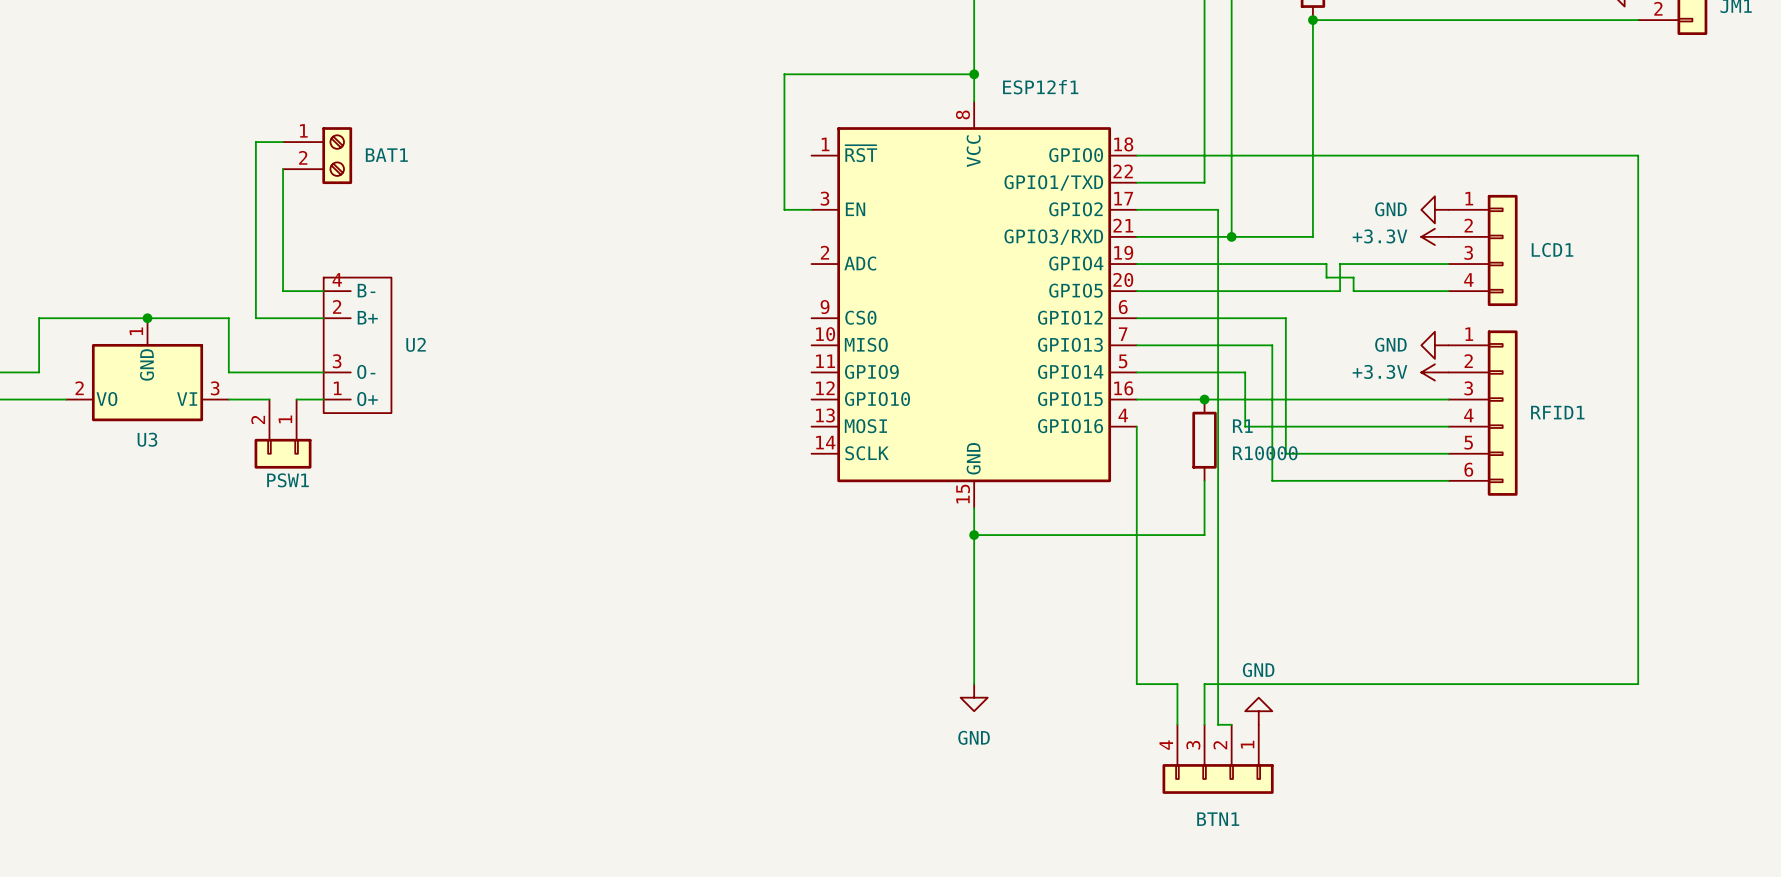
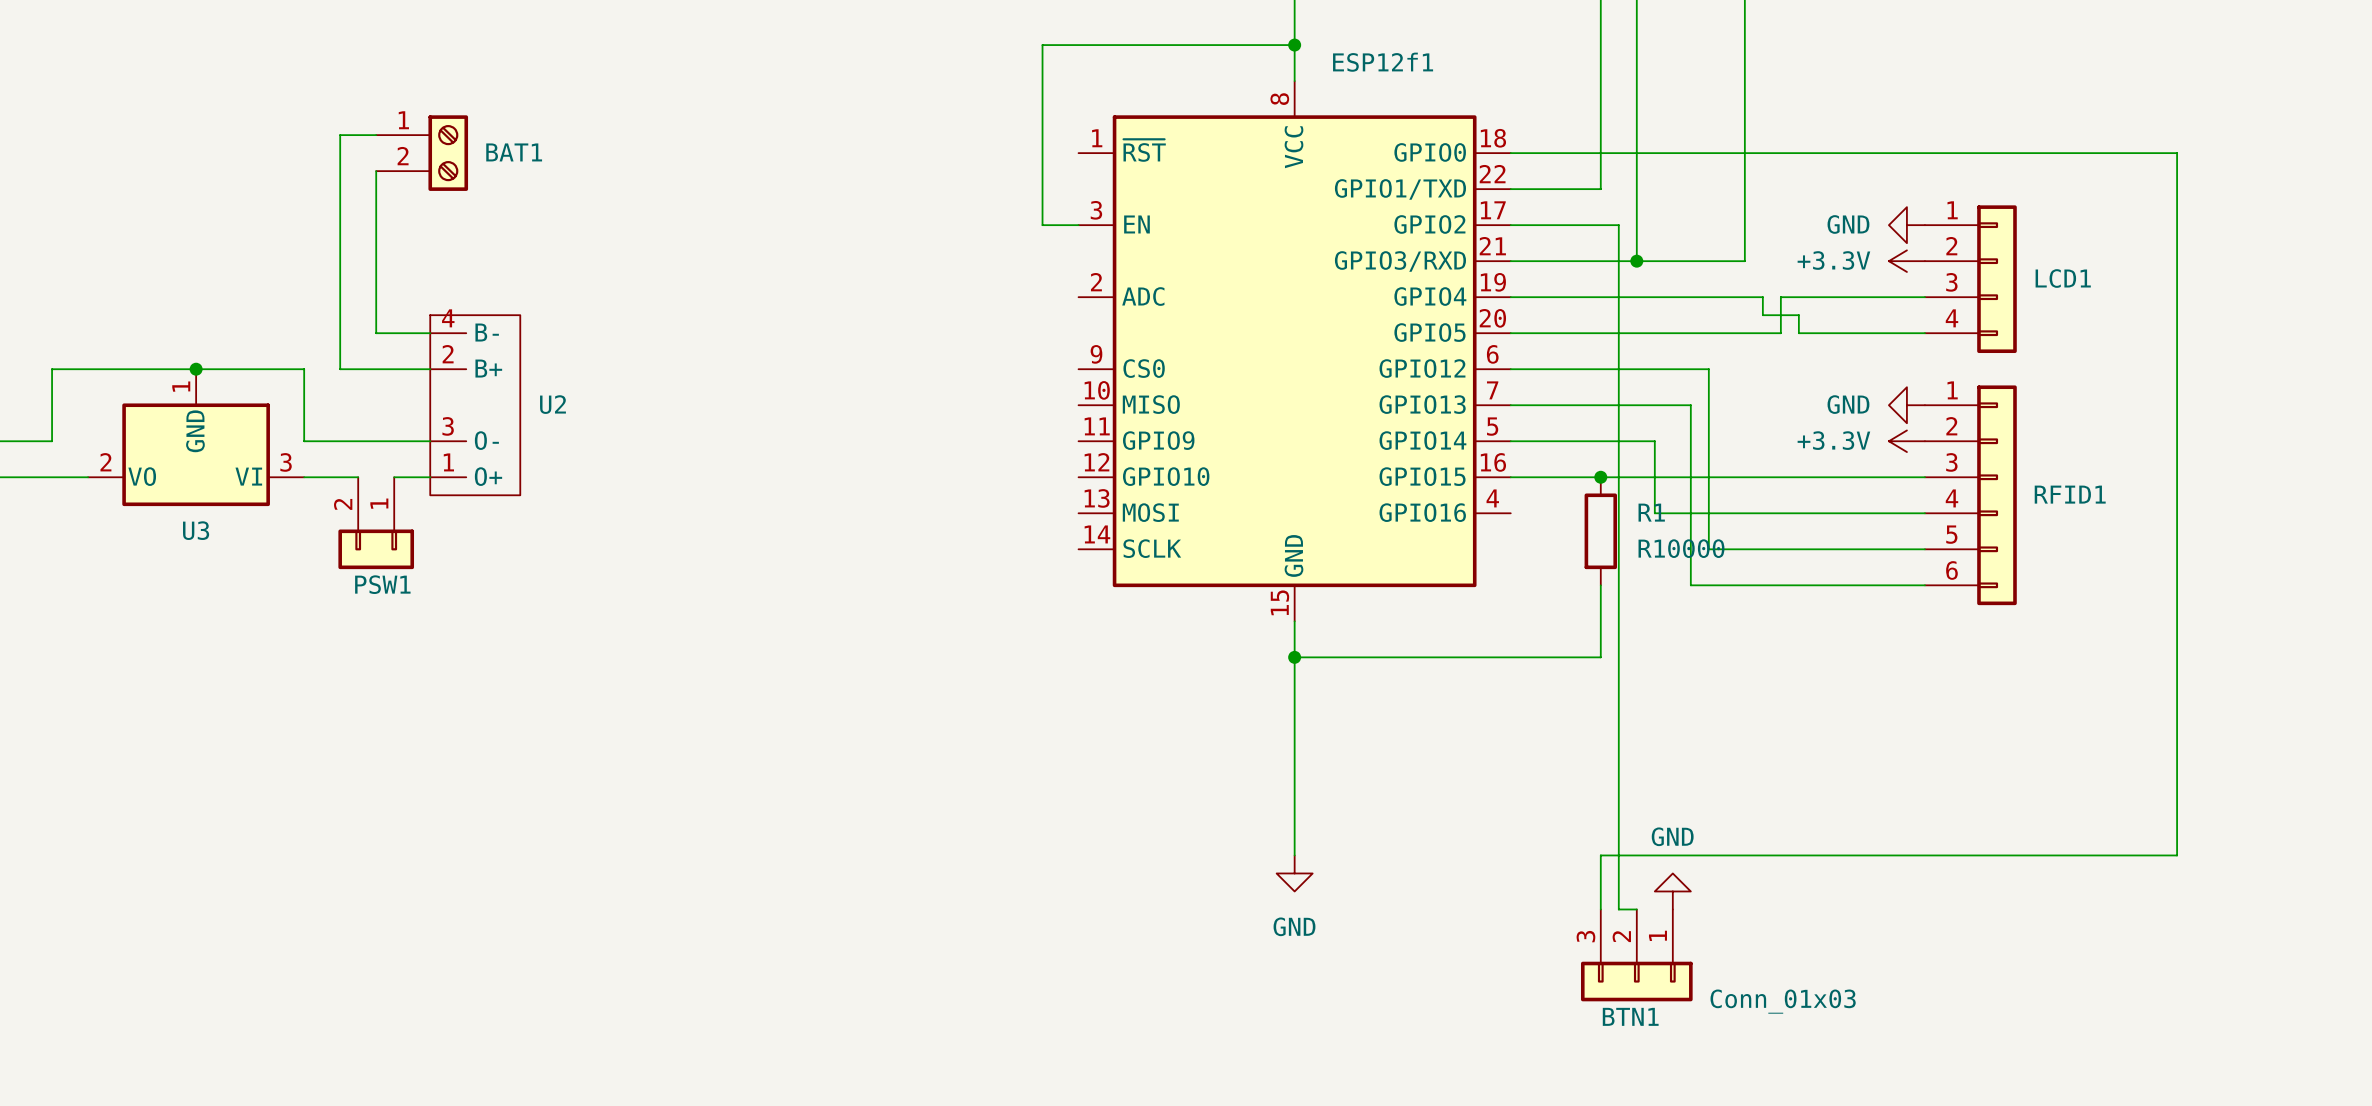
wire: (1136, 426) (1136, 684) (1177, 684) (1177, 724) -> none
BTN1 symbol: [1162, 724, 1274, 794] -> [1580, 909, 1693, 1002]
BTN1 value: none -> Conn_01x03 (1783, 1001)

